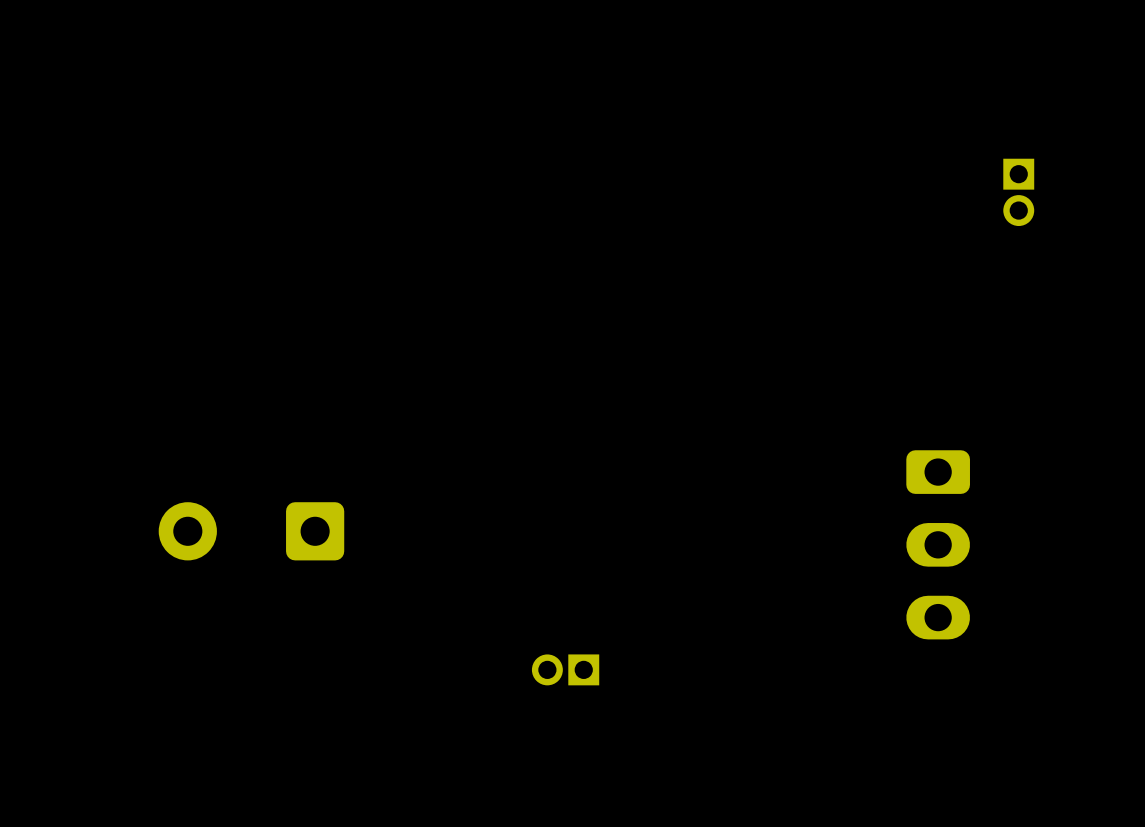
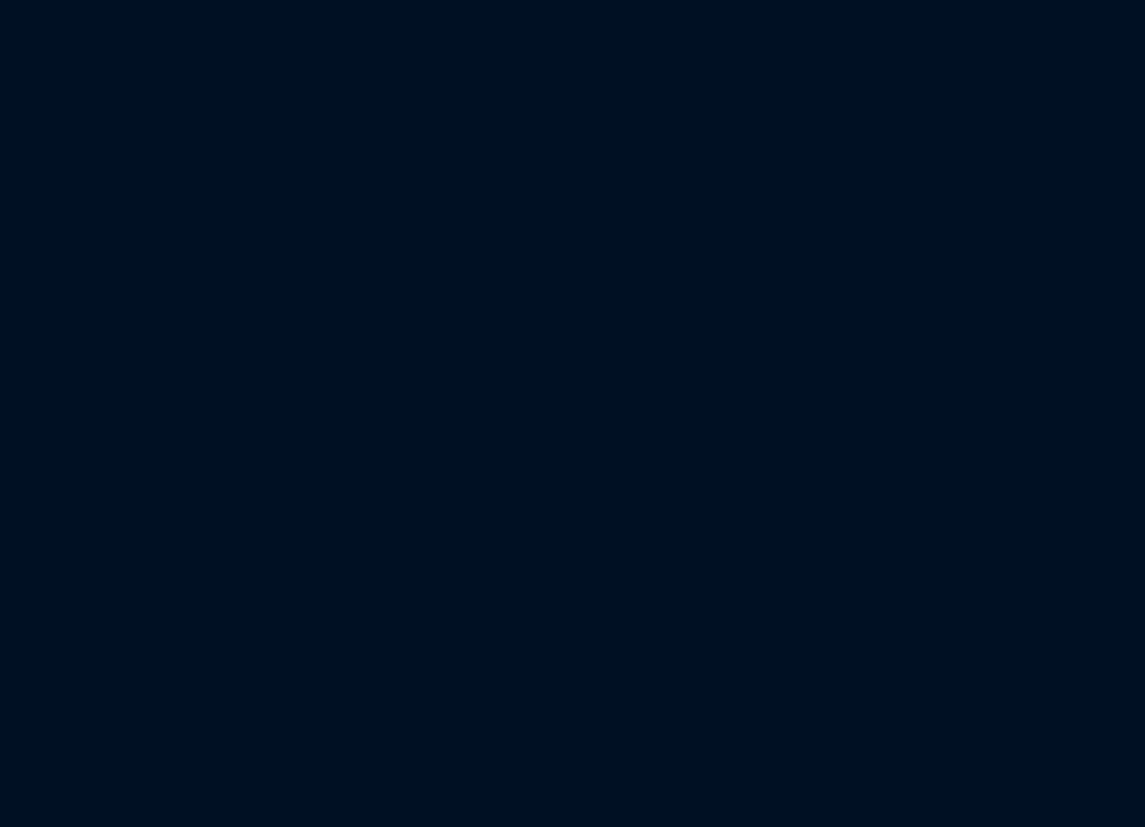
part: (1018, 192) -> none
part: (251, 531) -> none
part: (938, 544) -> none
part: (565, 669) -> none

